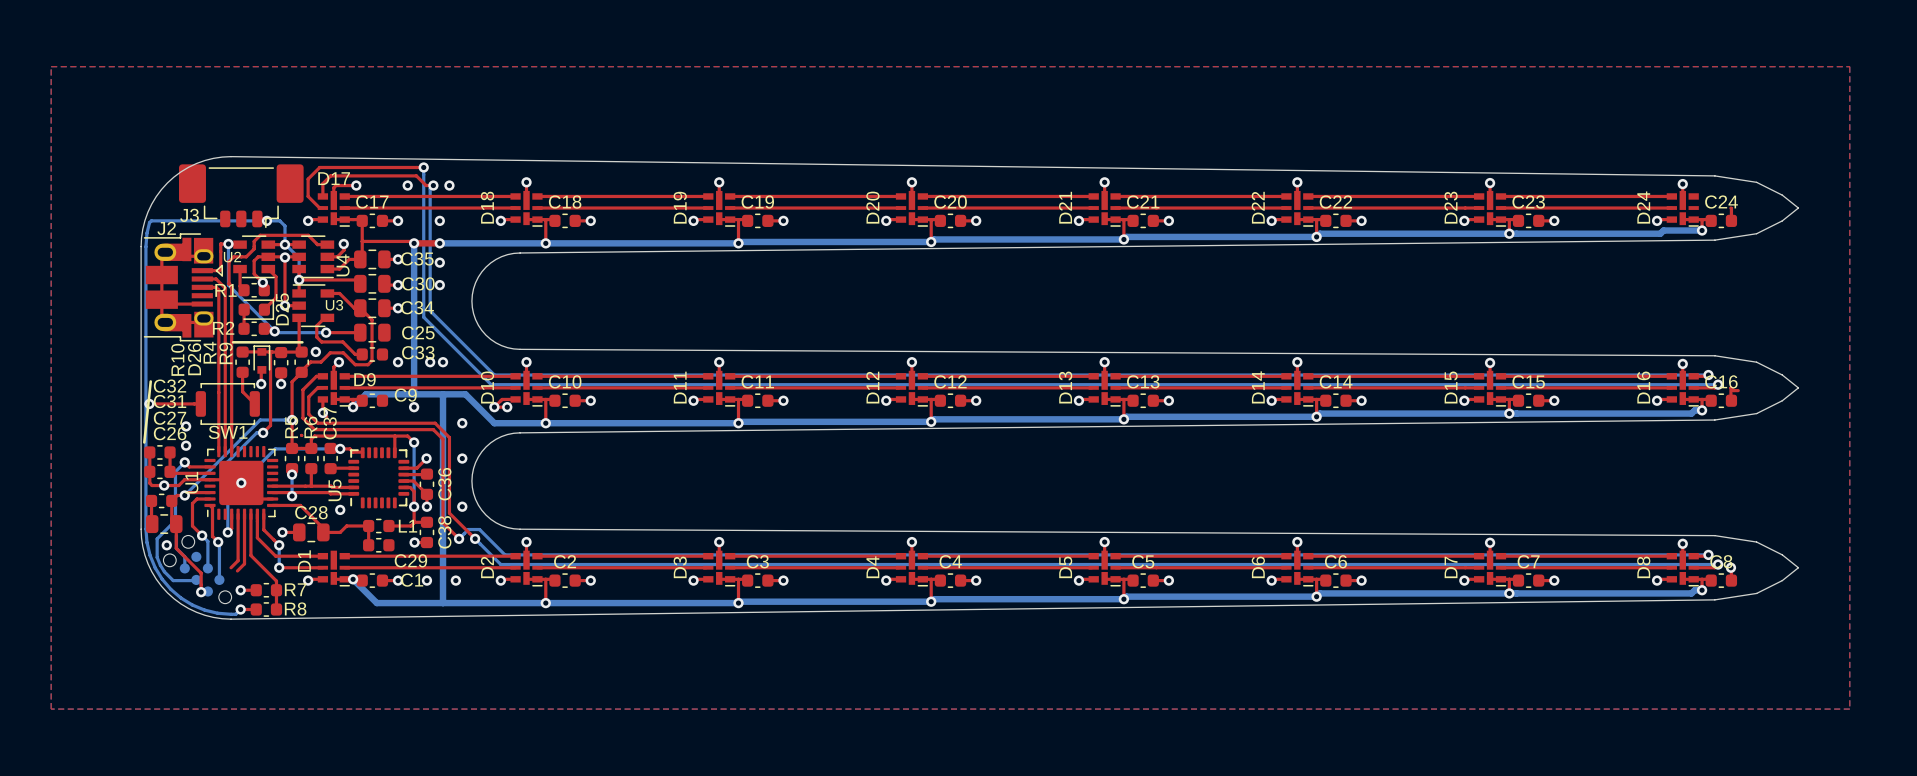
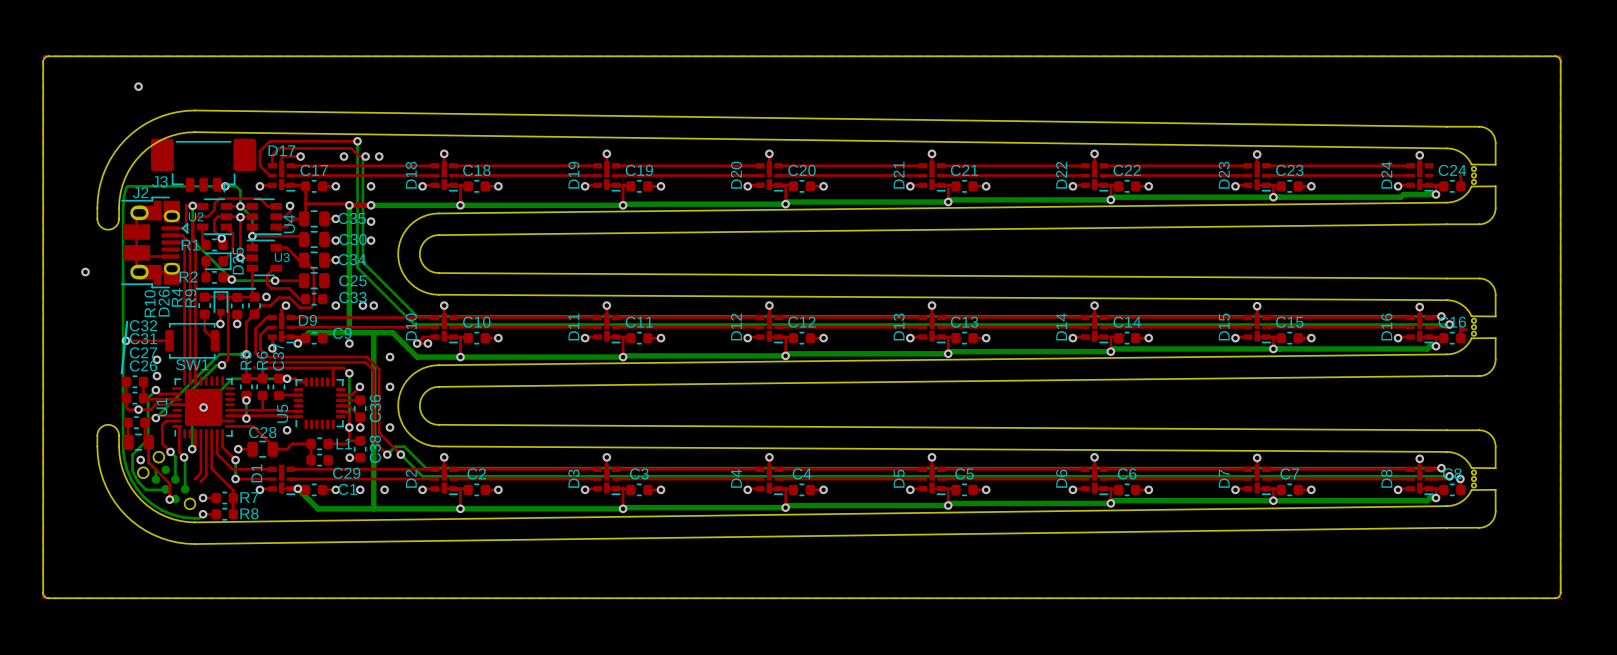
board edge: none -> (48, 56) (1557, 56) (1560, 61) (1560, 594) (1555, 598) (46, 597) (43, 592) (43, 61) (44, 57) (48, 56)
via: none -> (138, 86)
board edge: (1714, 175) (1756, 182) (1782, 195) (1798, 208) (1782, 220) (1756, 233) (1714, 240) -> (1446, 300) (1461, 304) (1471, 316) (1495, 316) (1494, 288) (1487, 280) (1479, 278) (438, 273) (425, 267) (419, 254) (425, 240) (438, 235) (1479, 224) (1487, 222) (1494, 214) (1495, 186) (1471, 186) (1461, 198) (1446, 202)
part: none -> (1473, 175)
board edge: (141, 259) (141, 516) -> (119, 218) (115, 226) (108, 229) (100, 226) (97, 220) (98, 191) (110, 159) (125, 139) (146, 123) (161, 116) (186, 110) (1479, 126) (1487, 128) (1494, 136) (1495, 164) (1471, 164) (1461, 152) (1446, 148)
via: none -> (85, 272)
board edge: (1714, 355) (1756, 362) (1782, 375) (1798, 387) (1782, 400) (1756, 413) (1714, 420) -> (1446, 451) (1461, 456) (1471, 467) (1495, 468) (1494, 440) (1489, 433) (1479, 430) (438, 424) (425, 419) (419, 405) (425, 392) (438, 386) (1479, 376) (1489, 372) (1494, 366) (1495, 338) (1471, 338) (1461, 349) (1446, 354)
part: none -> (1473, 327)
board edge: (1714, 535) (1756, 542) (1782, 554) (1798, 567) (1782, 580) (1756, 593) (1714, 599) -> (119, 435) (115, 427) (108, 424) (100, 427) (97, 434) (98, 463) (110, 495) (125, 515) (146, 530) (169, 540) (186, 543) (1479, 527) (1489, 524) (1494, 517) (1495, 489) (1471, 490) (1461, 501) (1446, 506)
part: none -> (1473, 479)

